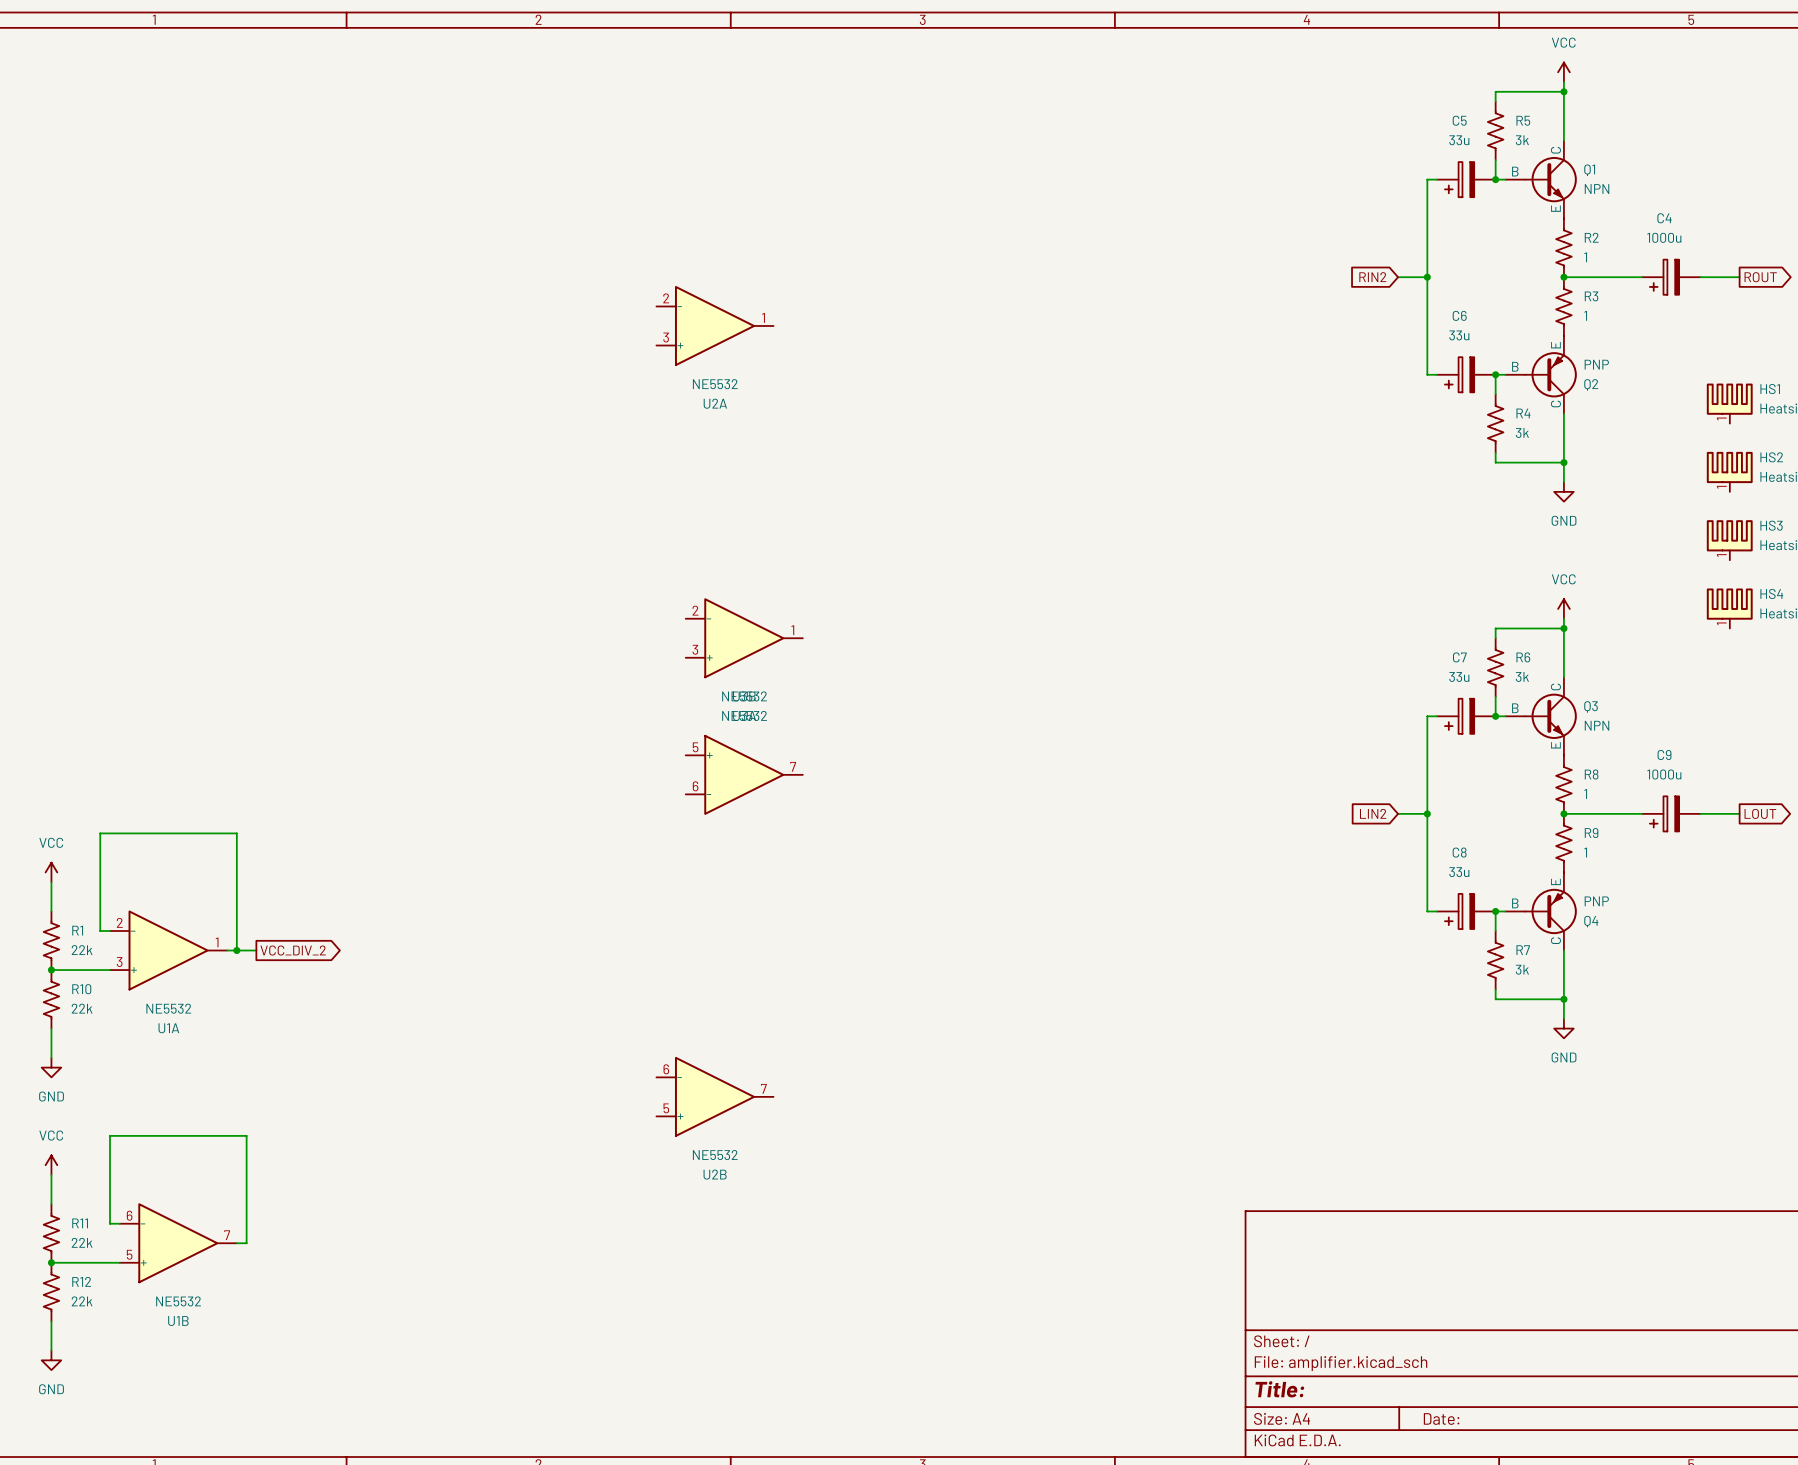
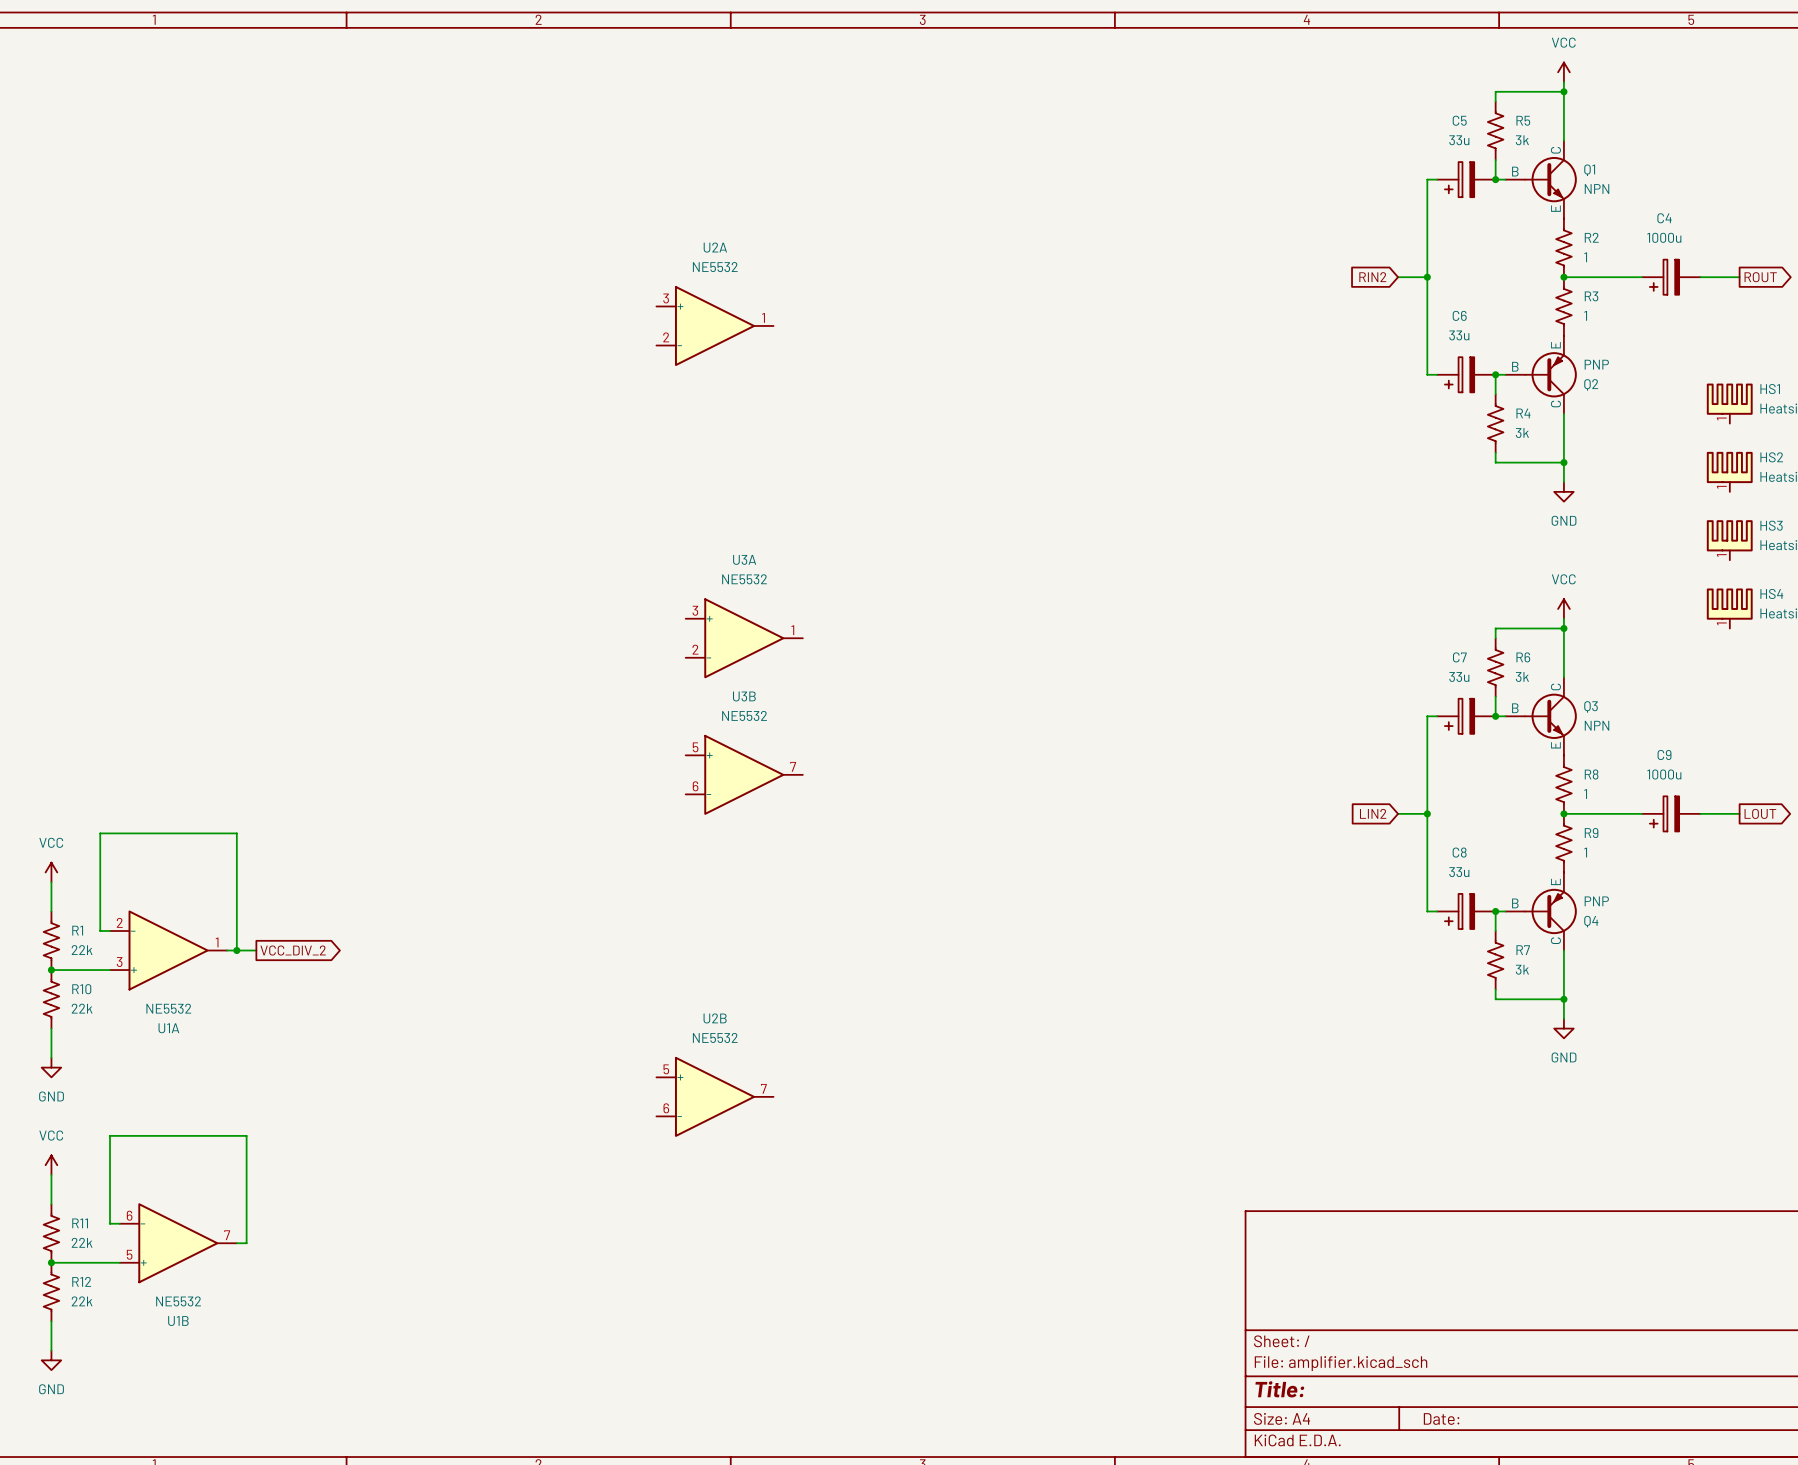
U2A flip: as is (715, 325) -> up-down (715, 325)
U3A flip: as is (744, 638) -> up-down (744, 638)
U2B flip: as is (715, 1096) -> up-down (715, 1096)

